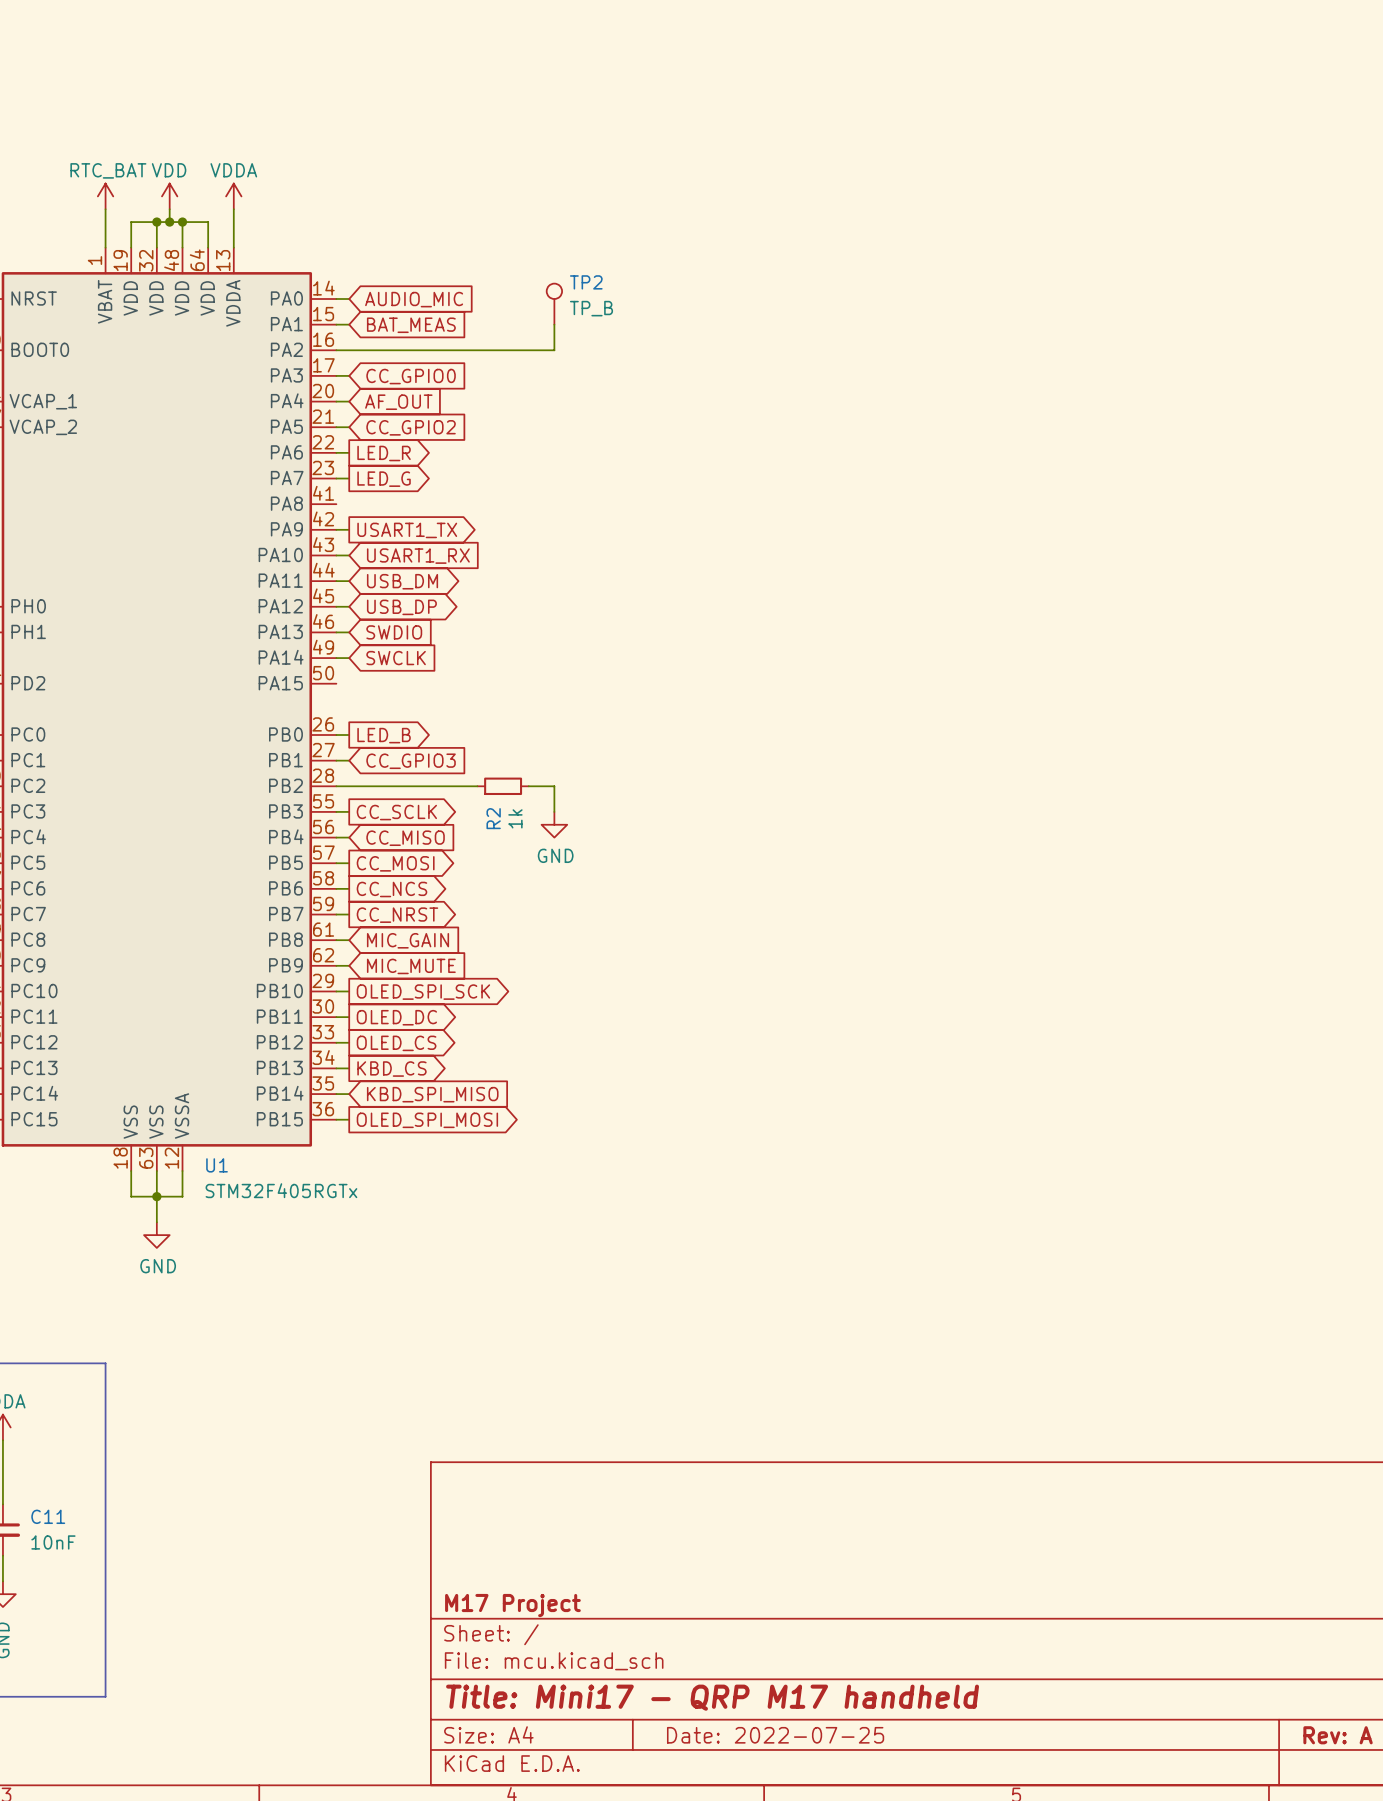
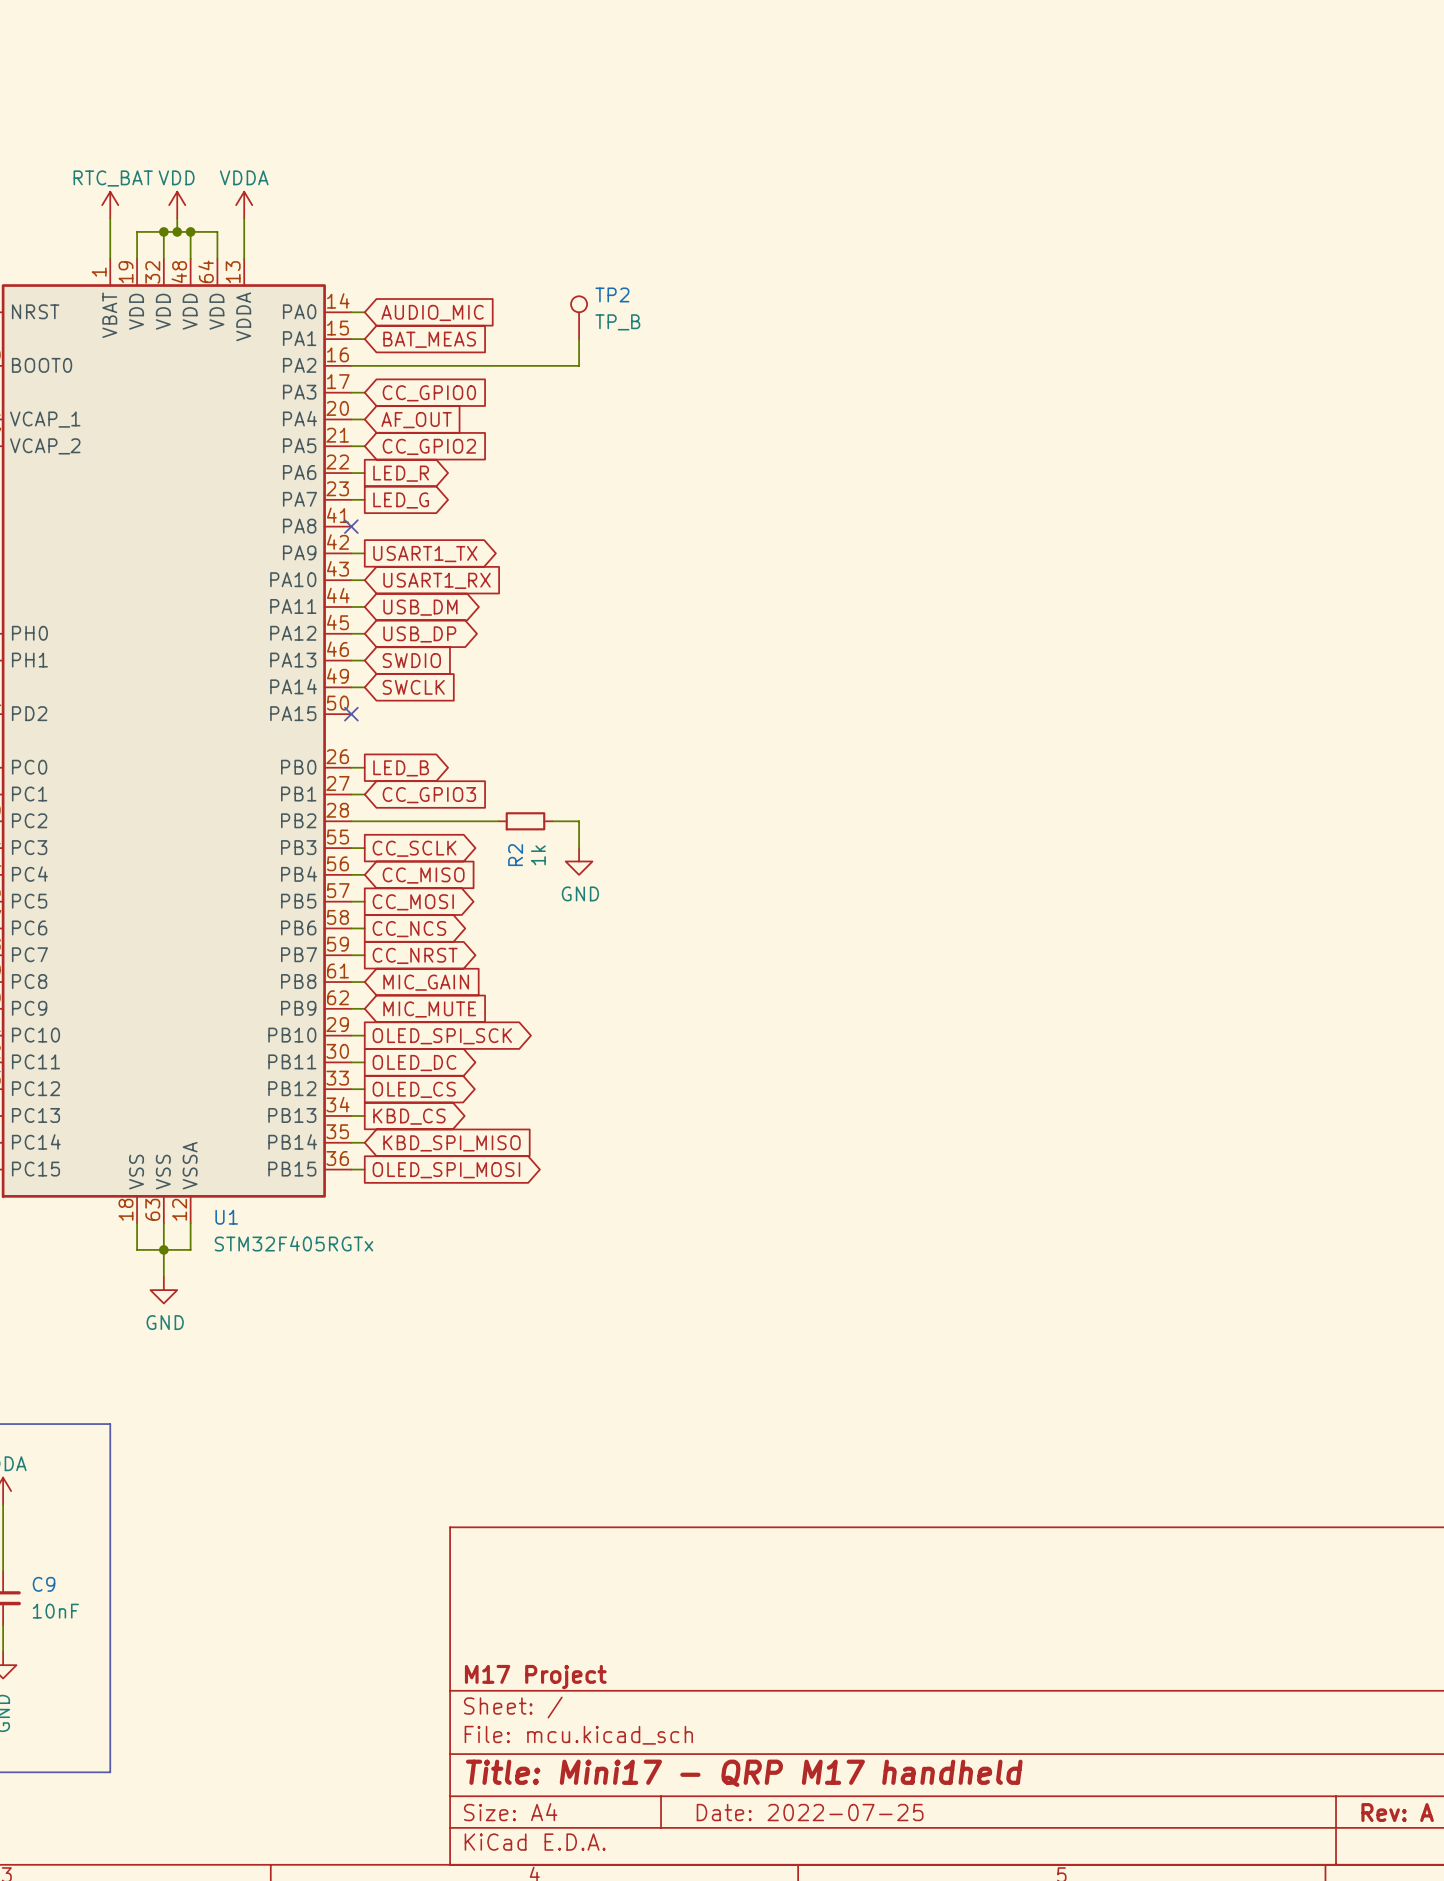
no-connect mark: none -> (351, 526)
no-connect mark: none -> (351, 714)
C11 name: C11 (48, 1516) -> C9 (44, 1584)

